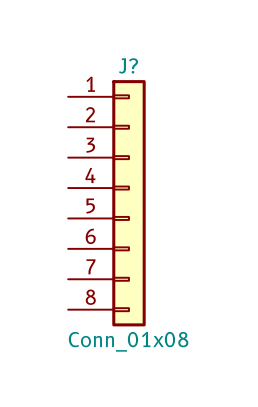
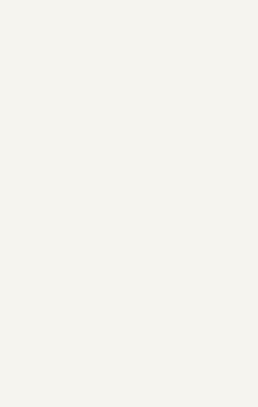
J?: Conn_01x08 (106, 203) -> none

